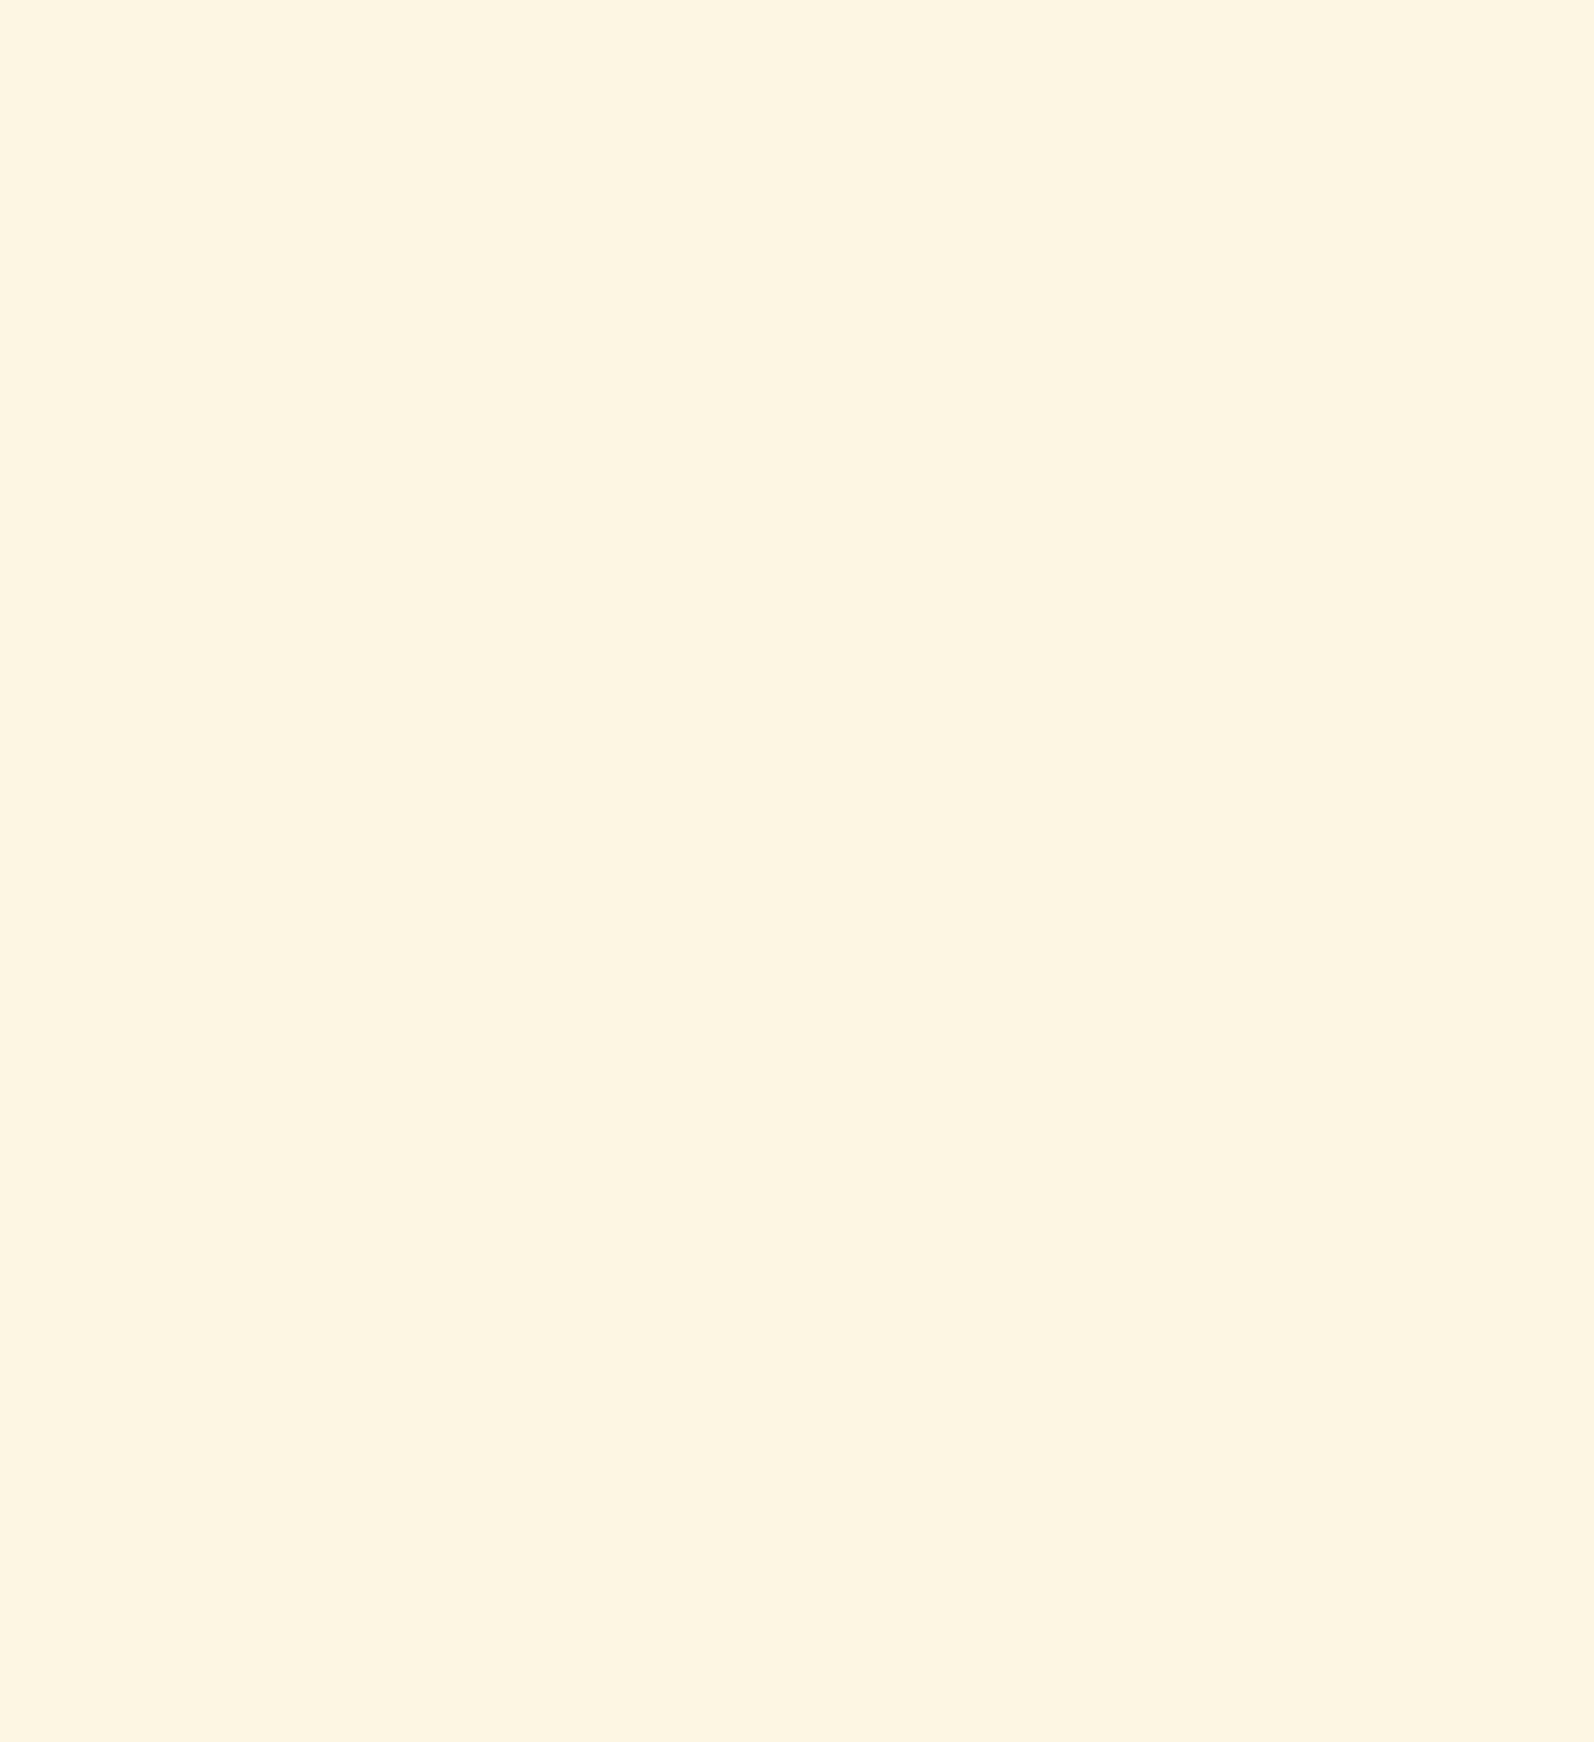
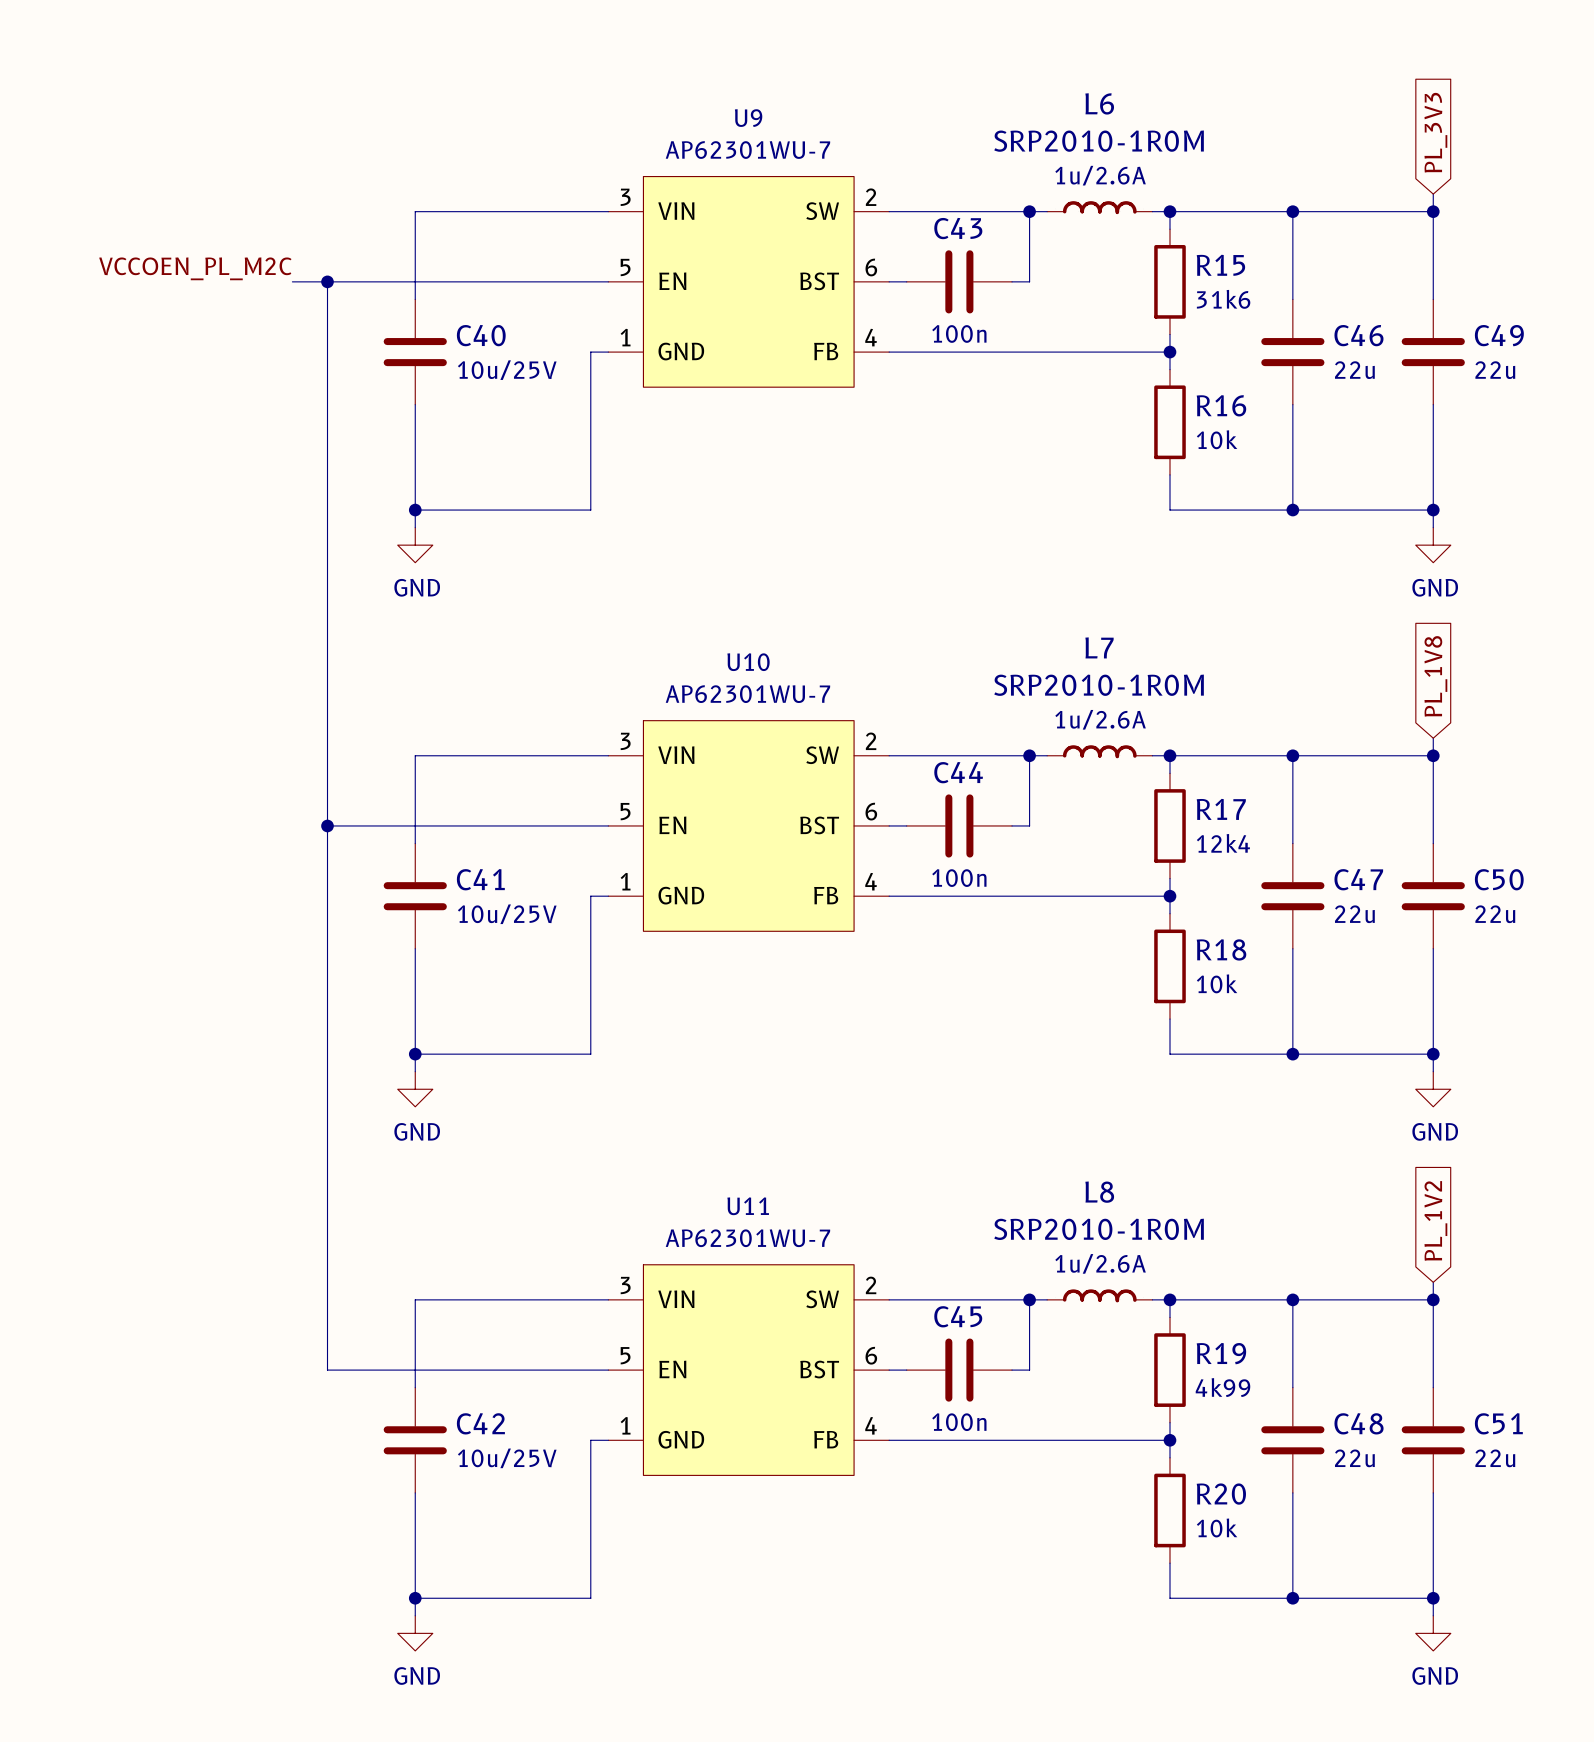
global label: none -> PL_3V3 (1435, 132)
wire: none -> (1433, 194) (1433, 299)
L6: none -> SRP2010-1R0M (1099, 207)
wire: none -> (608, 211) (415, 211) (415, 299)
wire: none -> (889, 211) (1047, 211)
wire: none -> (1029, 211) (1029, 281) (1012, 281)
junction: none -> (1029, 211)
wire: none -> (1152, 211) (1433, 211)
wire: none -> (1169, 211) (1169, 229)
junction: none -> (1169, 211)
wire: none -> (1292, 211) (1292, 299)
junction: none -> (1292, 211)
junction: none -> (1433, 211)
label: none -> VCCOEN_PL_M2C (195, 268)
wire: none -> (292, 281) (608, 281)
wire: none -> (327, 281) (327, 1370) (608, 1370)
junction: none -> (327, 281)
U9: none -> AP62301WU-7 (748, 281)
wire: none -> (889, 281) (906, 281)
C43: none -> (959, 281)
R15: none -> (1169, 281)
wire: none -> (1169, 334) (1169, 369)
C40: none -> (415, 352)
wire: none -> (608, 352) (590, 352) (590, 510) (415, 510)
wire: none -> (889, 352) (1169, 352)
junction: none -> (1169, 352)
C46: none -> (1292, 352)
C49: none -> (1433, 352)
wire: none -> (415, 404) (415, 527)
wire: none -> (1292, 404) (1292, 510)
wire: none -> (1433, 404) (1433, 527)
R16: none -> (1169, 422)
wire: none -> (1169, 474) (1169, 510) (1433, 510)
junction: none -> (415, 510)
junction: none -> (1292, 510)
junction: none -> (1433, 510)
power symbol: none -> GND (415, 545)
power symbol: none -> GND (1433, 545)
global label: none -> PL_1V8 (1435, 676)
wire: none -> (1433, 738) (1433, 843)
L7: none -> SRP2010-1R0M (1099, 751)
wire: none -> (608, 755) (415, 755) (415, 843)
wire: none -> (889, 755) (1047, 755)
wire: none -> (1029, 755) (1029, 825) (1012, 825)
junction: none -> (1029, 755)
wire: none -> (1152, 755) (1433, 755)
wire: none -> (1169, 755) (1169, 773)
junction: none -> (1169, 755)
wire: none -> (1292, 755) (1292, 843)
junction: none -> (1292, 755)
junction: none -> (1433, 755)
wire: none -> (327, 825) (608, 825)
junction: none -> (327, 825)
U10: none -> AP62301WU-7 (748, 825)
wire: none -> (889, 825) (906, 825)
C44: none -> (959, 825)
R17: none -> (1169, 825)
wire: none -> (1169, 878) (1169, 913)
C41: none -> (415, 896)
wire: none -> (608, 896) (590, 896) (590, 1054) (415, 1054)
wire: none -> (889, 896) (1169, 896)
junction: none -> (1169, 896)
C47: none -> (1292, 896)
C50: none -> (1433, 896)
wire: none -> (415, 948) (415, 1071)
wire: none -> (1292, 948) (1292, 1054)
wire: none -> (1433, 948) (1433, 1071)
R18: none -> (1169, 966)
wire: none -> (1169, 1019) (1169, 1054) (1433, 1054)
junction: none -> (415, 1054)
junction: none -> (1292, 1054)
junction: none -> (1433, 1054)
power symbol: none -> GND (415, 1089)
power symbol: none -> GND (1433, 1089)
global label: none -> PL_1V2 (1435, 1220)
wire: none -> (1433, 1282) (1433, 1387)
L8: none -> SRP2010-1R0M (1099, 1295)
wire: none -> (608, 1299) (415, 1299) (415, 1387)
wire: none -> (889, 1299) (1047, 1299)
wire: none -> (1029, 1299) (1029, 1370) (1012, 1370)
junction: none -> (1029, 1299)
wire: none -> (1152, 1299) (1433, 1299)
wire: none -> (1169, 1299) (1169, 1317)
junction: none -> (1169, 1299)
wire: none -> (1292, 1299) (1292, 1387)
junction: none -> (1292, 1299)
junction: none -> (1433, 1299)
U11: none -> AP62301WU-7 (748, 1370)
wire: none -> (889, 1370) (906, 1370)
C45: none -> (959, 1370)
R19: none -> (1169, 1370)
wire: none -> (1169, 1422) (1169, 1457)
C42: none -> (415, 1440)
wire: none -> (608, 1440) (590, 1440) (590, 1598) (415, 1598)
wire: none -> (889, 1440) (1169, 1440)
junction: none -> (1169, 1440)
C48: none -> (1292, 1440)
C51: none -> (1433, 1440)
wire: none -> (415, 1492) (415, 1615)
wire: none -> (1292, 1492) (1292, 1598)
wire: none -> (1433, 1492) (1433, 1615)
R20: none -> (1169, 1510)
wire: none -> (1169, 1563) (1169, 1598) (1433, 1598)
junction: none -> (415, 1598)
junction: none -> (1292, 1598)
junction: none -> (1433, 1598)
power symbol: none -> GND (415, 1633)
power symbol: none -> GND (1433, 1633)

